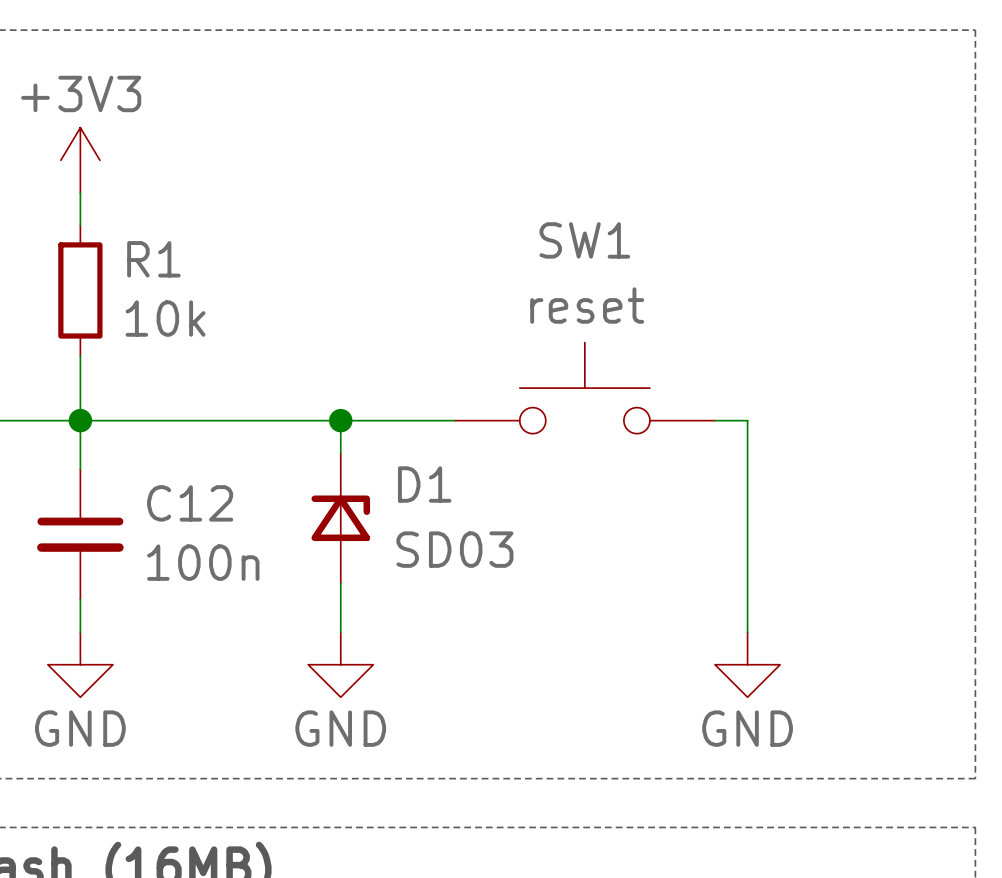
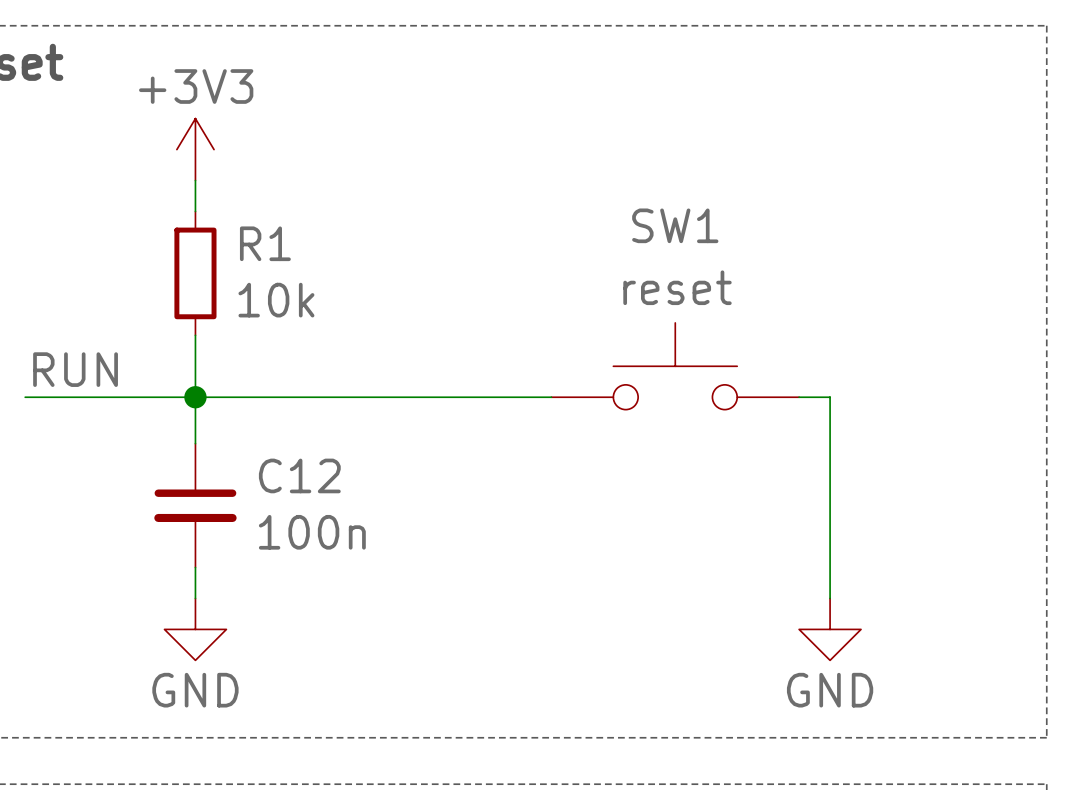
wire: (340, 420) (340, 453) -> none
junction: (340, 420) -> none
D1: SD03 (340, 518) -> none
wire: (340, 583) (340, 632) -> none
power symbol: GND (340, 664) -> none

